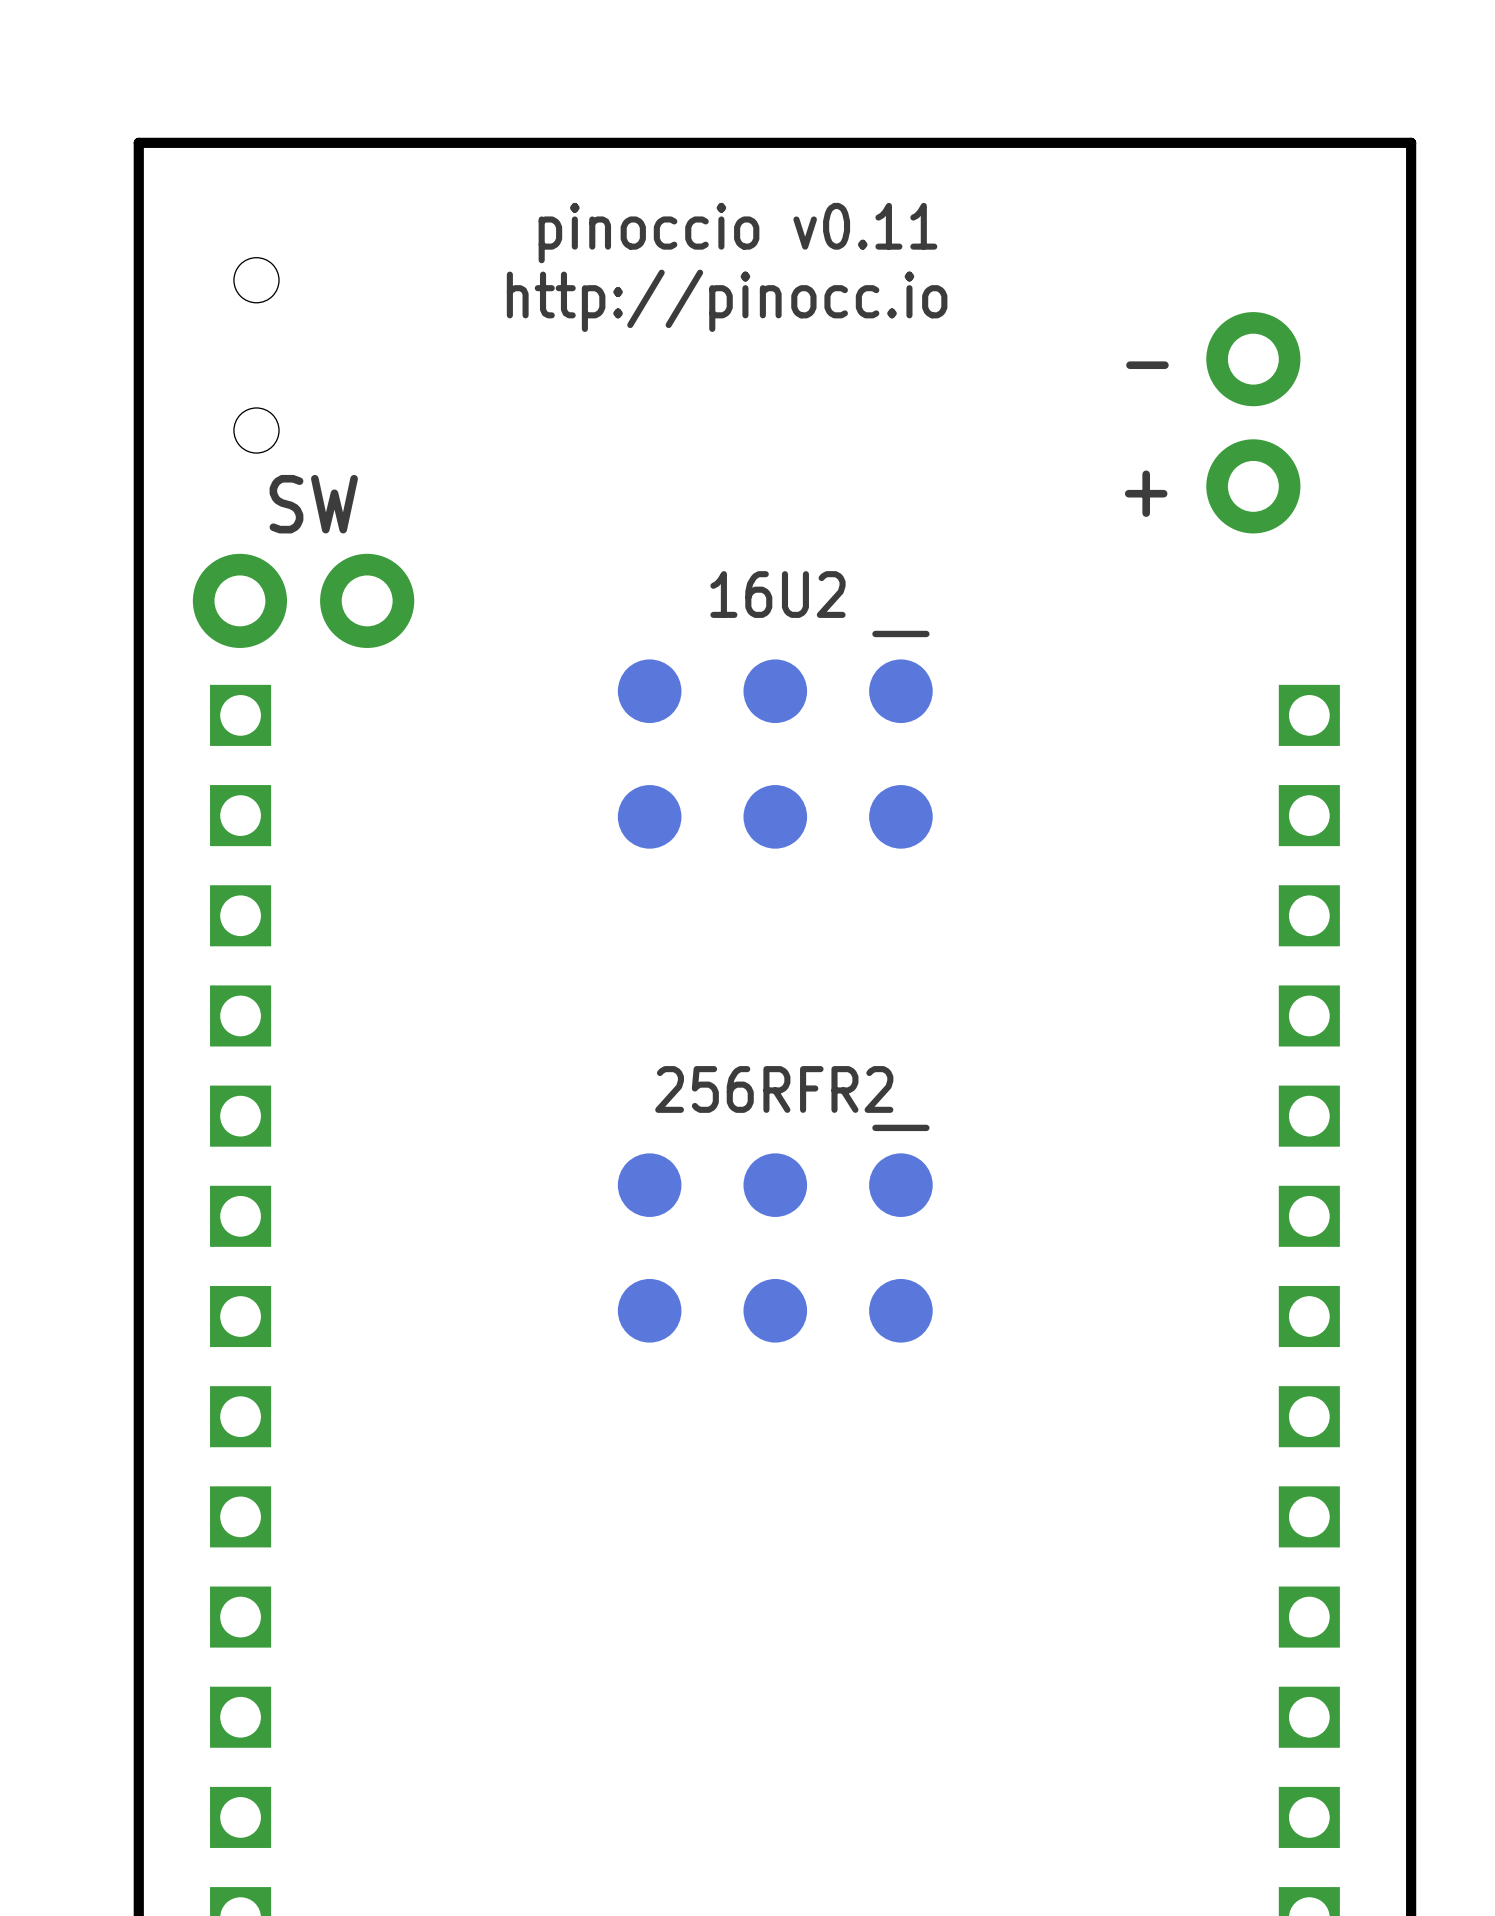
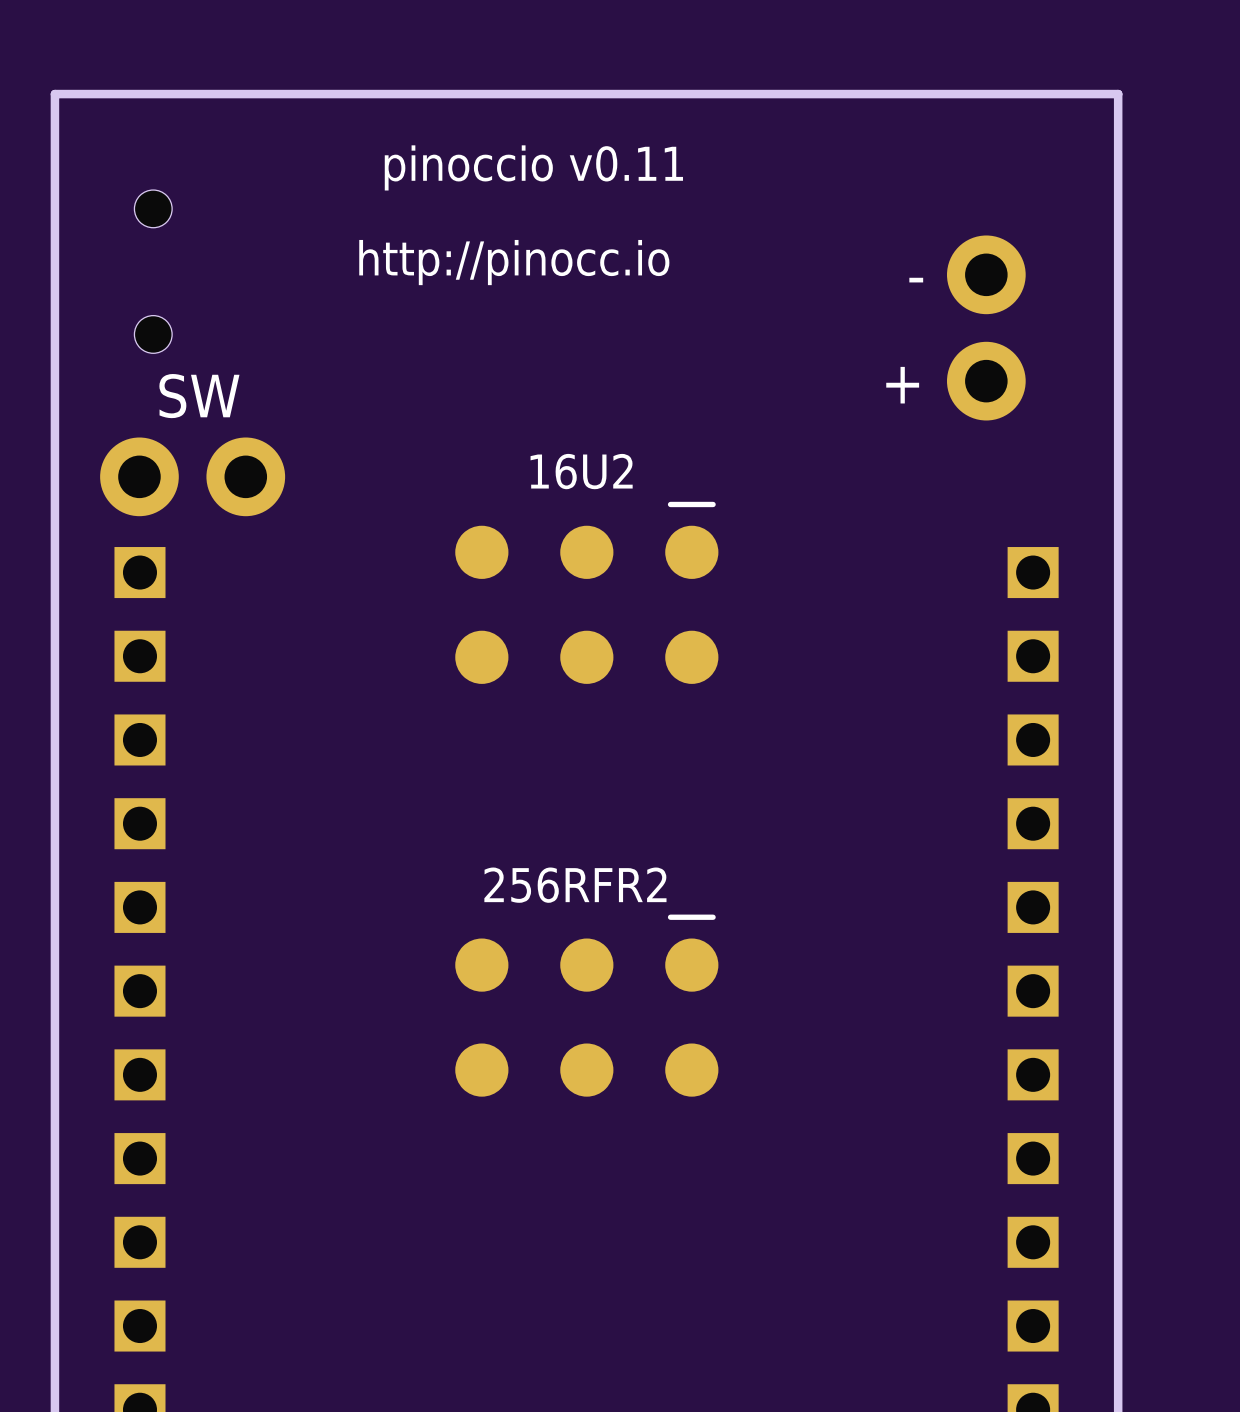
text position: http://pinocc.io (727, 300) -> http://pinocc.io (514, 262)

